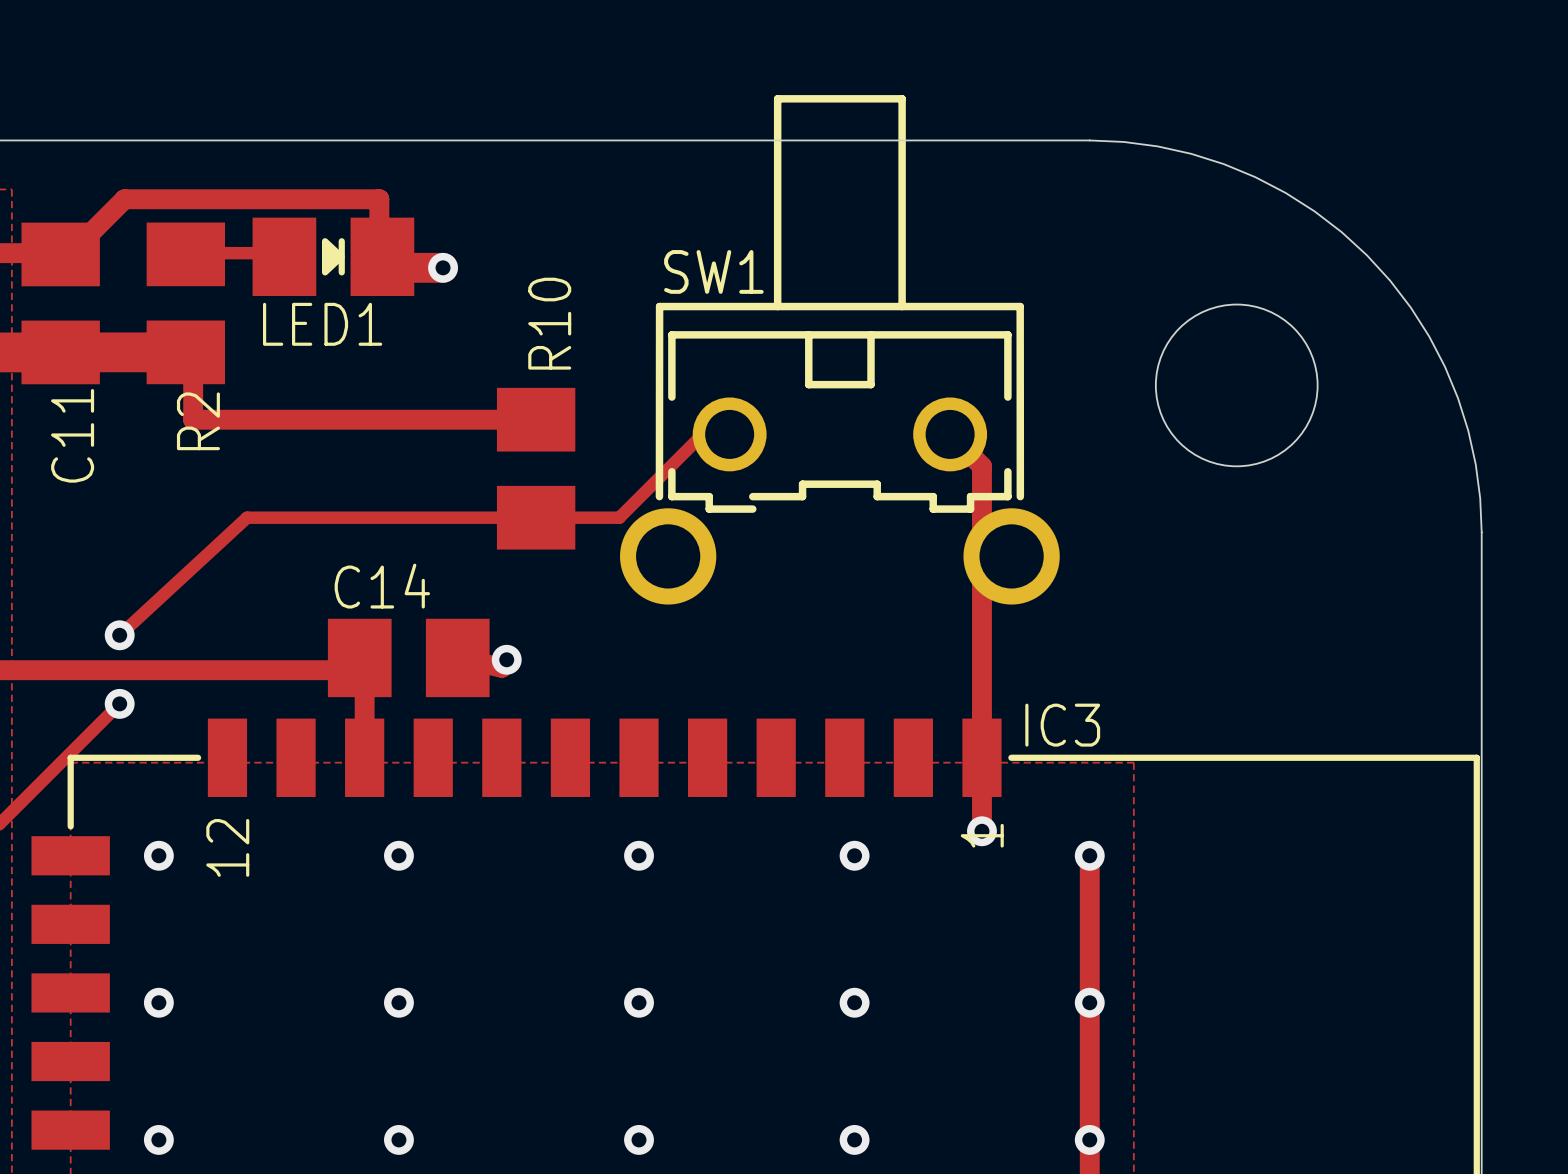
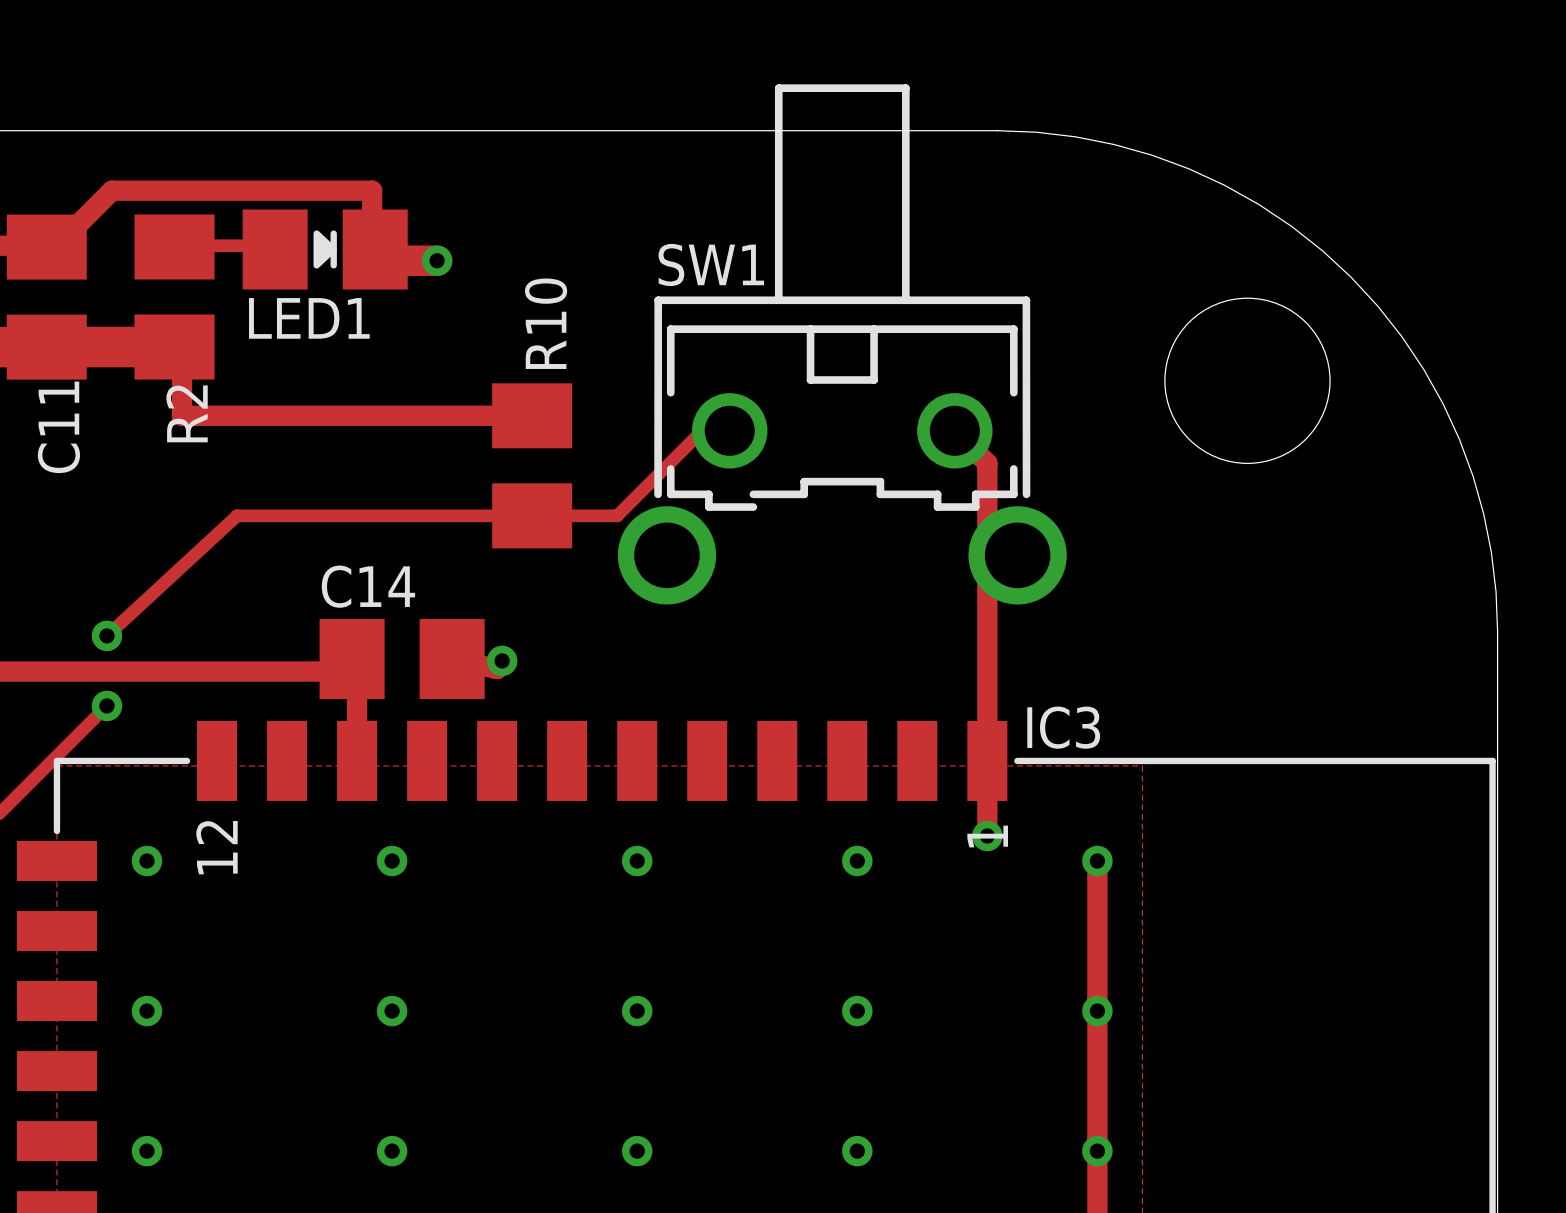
board edge: (991, 140) (1123, 141) (1191, 153) (1255, 177) (1285, 192) (1341, 232) (1366, 255) (1390, 280) (1429, 336) (1444, 366) (1468, 430) (1480, 498) (1481, 630) -> (997, 130) (1036, 132) (1075, 136) (1114, 144) (1151, 155) (1188, 168) (1224, 185) (1258, 204) (1291, 226) (1322, 250) (1351, 277) (1377, 306) (1402, 336) (1423, 369) (1443, 403) (1459, 439) (1473, 476) (1483, 514) (1491, 552) (1496, 591) (1497, 630)

